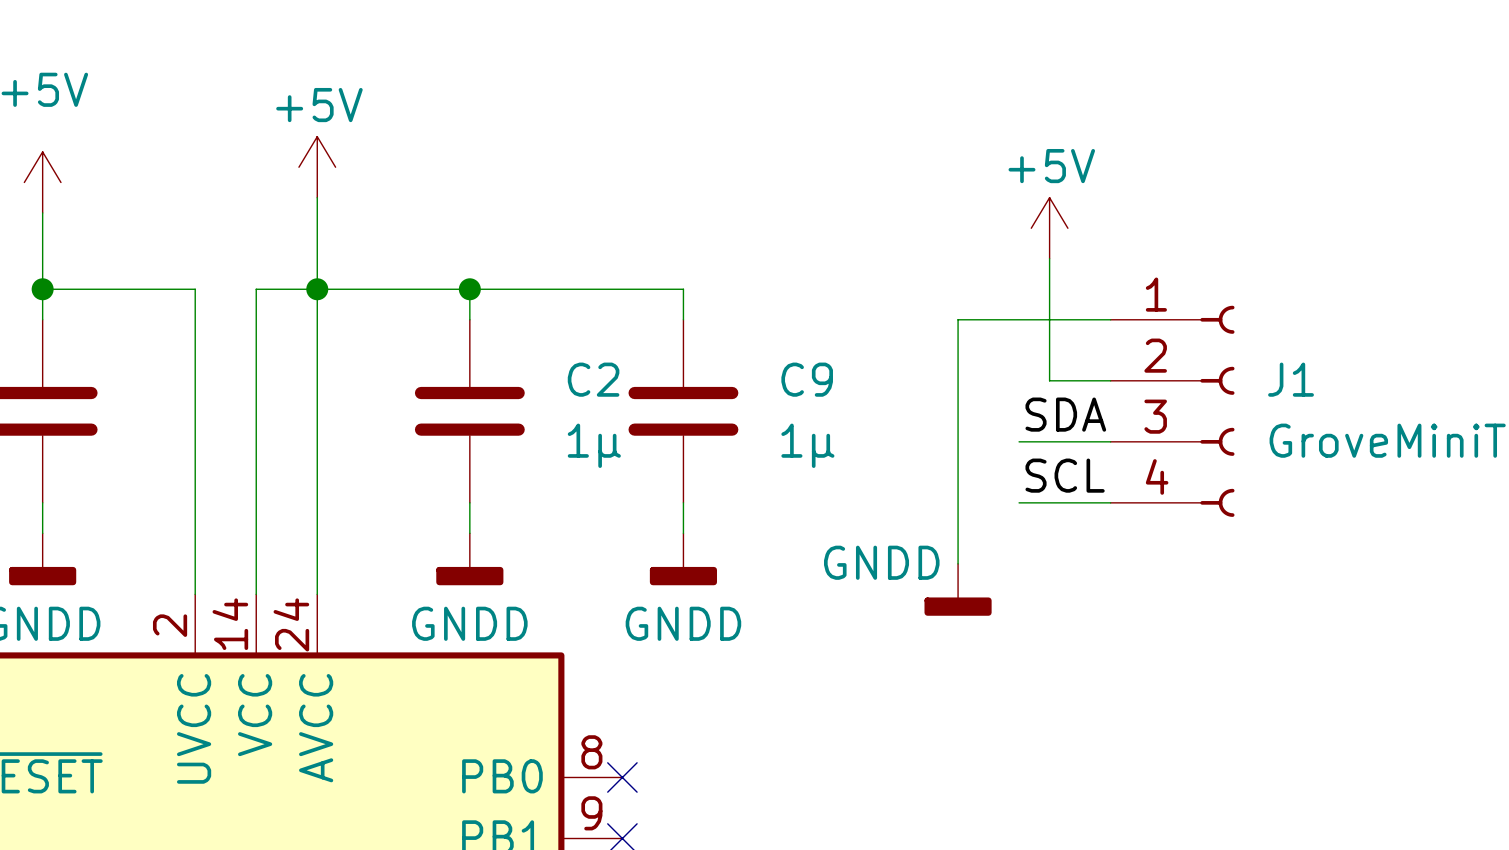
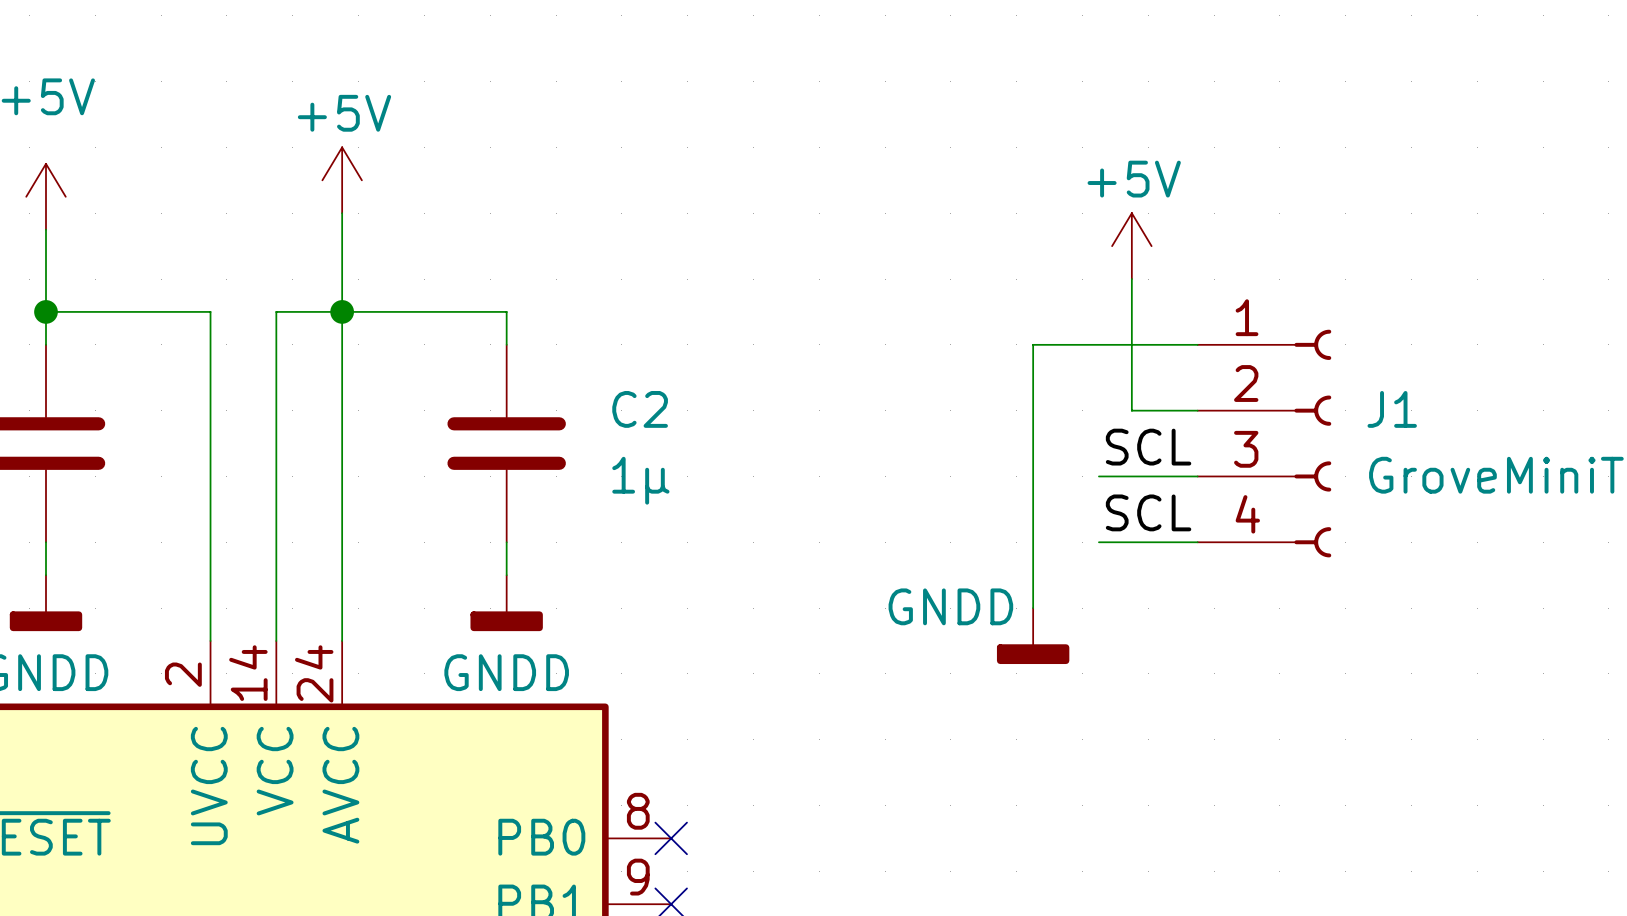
wire: (469, 289) (683, 289) (683, 319) -> none
junction: (469, 289) -> none
C9: 1µ (683, 411) -> none
label: SDA (1065, 414) -> SCL (1148, 447)
wire: (683, 502) (683, 533) -> none
power symbol: GNDD (683, 559) -> none

